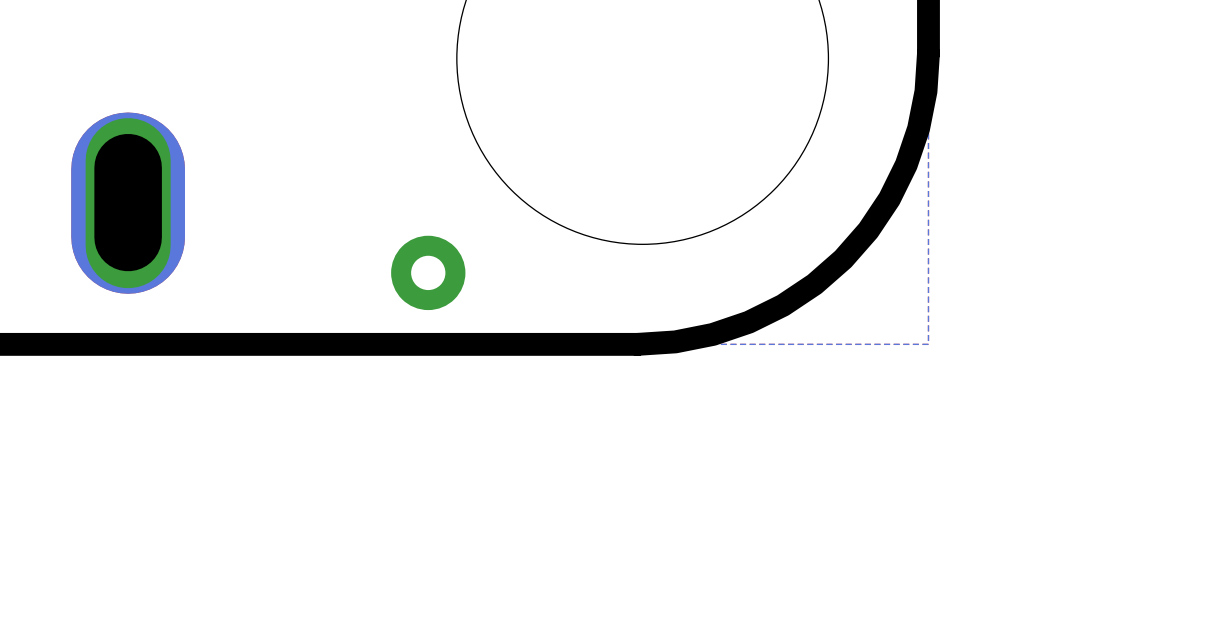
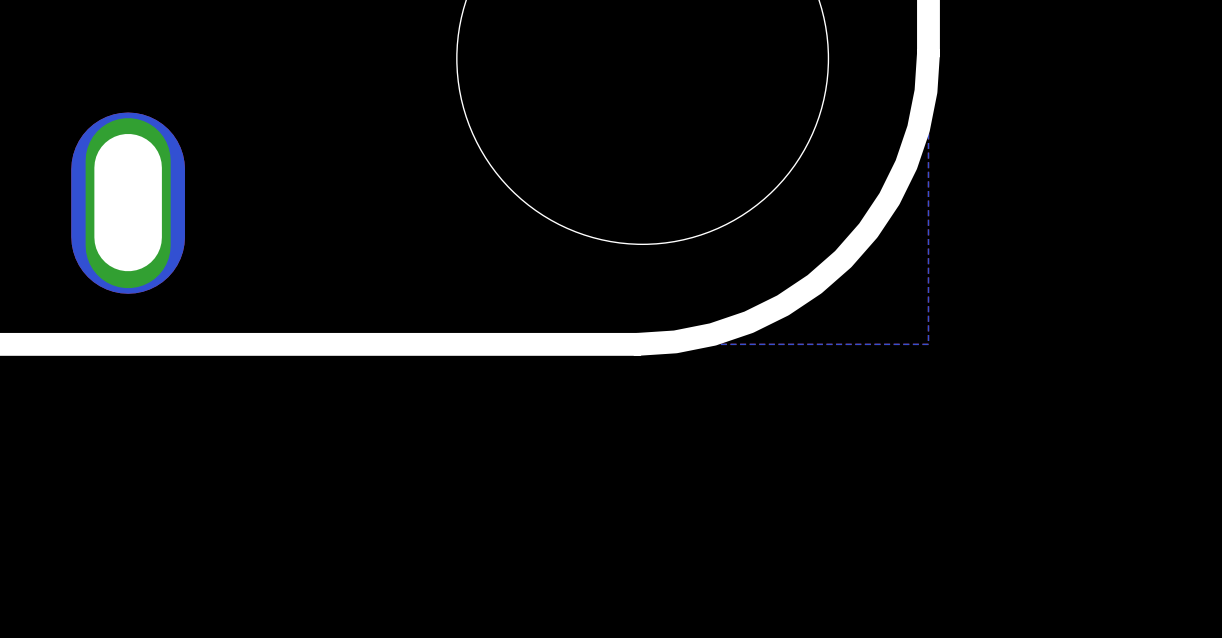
via: (428, 272) -> none

